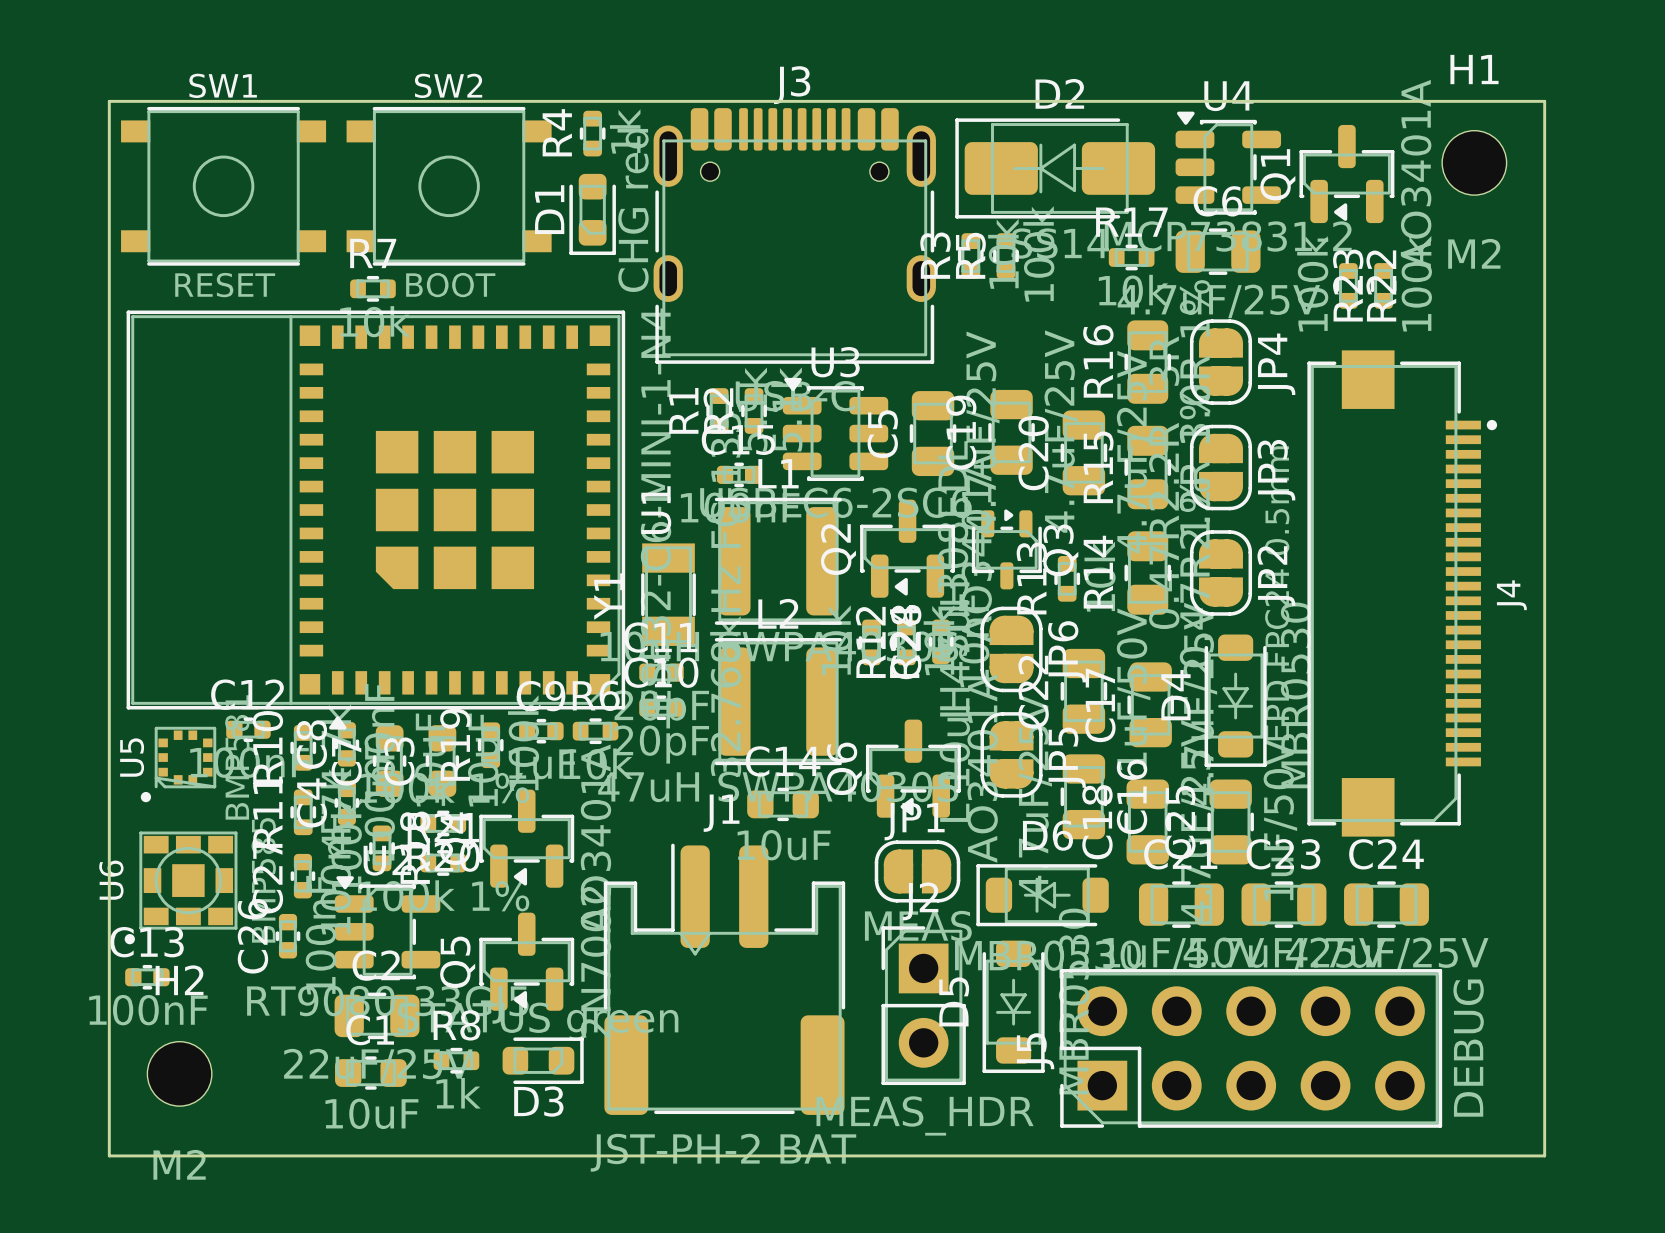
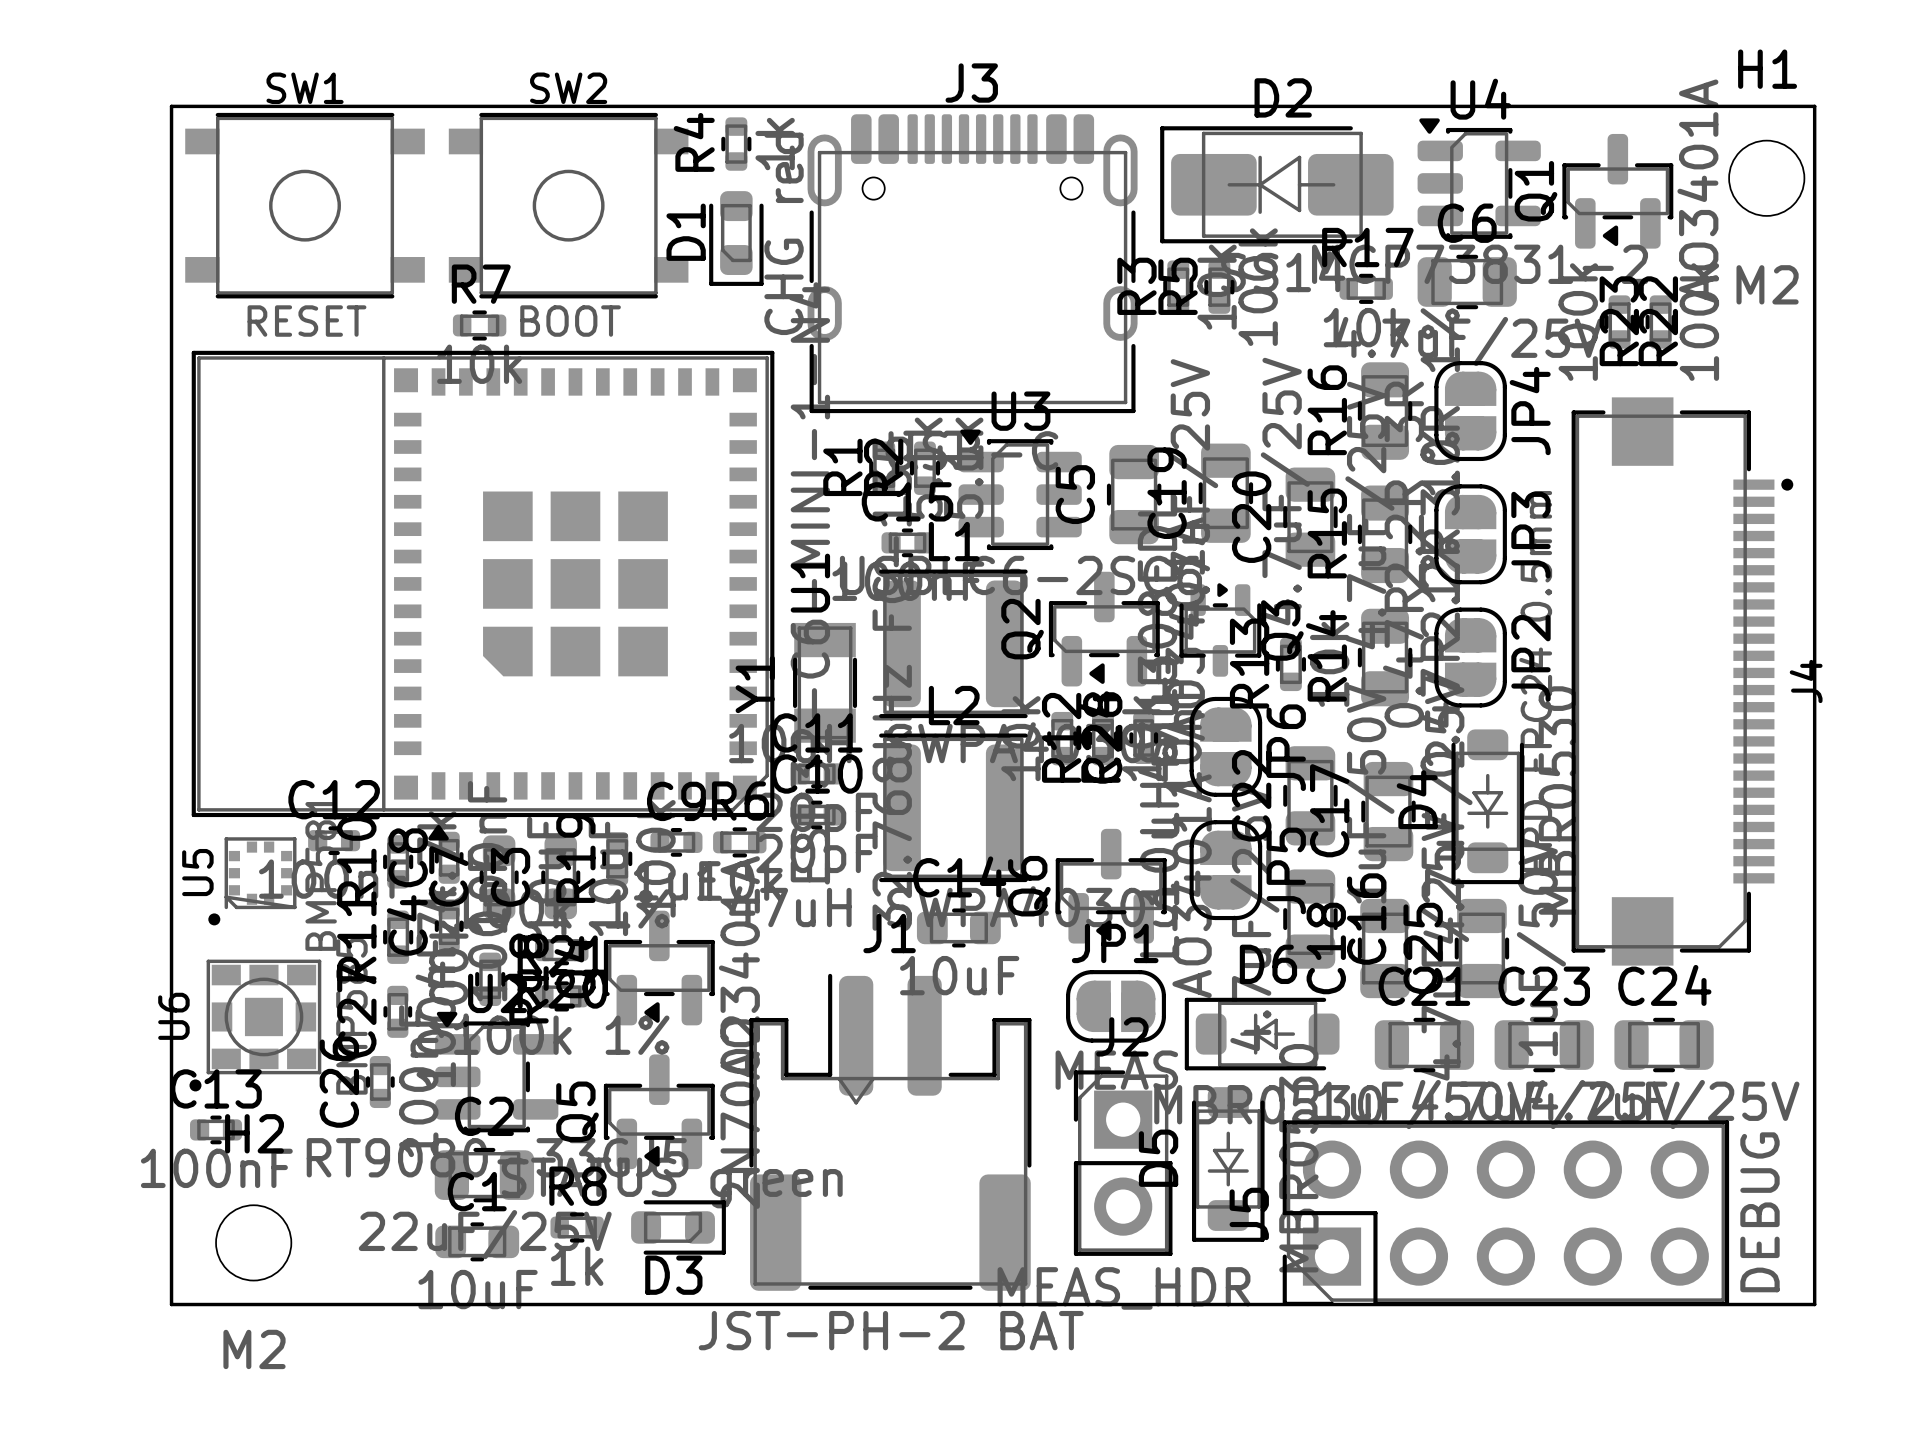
board edge: (1515, 101) (1544, 101) (1544, 1155) (109, 1155) (109, 1126) -> (1814, 106) (1814, 1304) (171, 1304)

